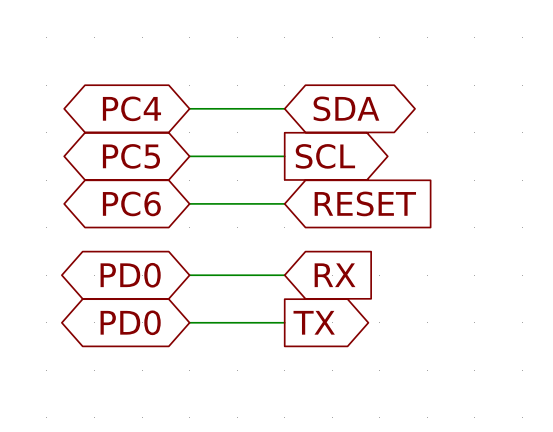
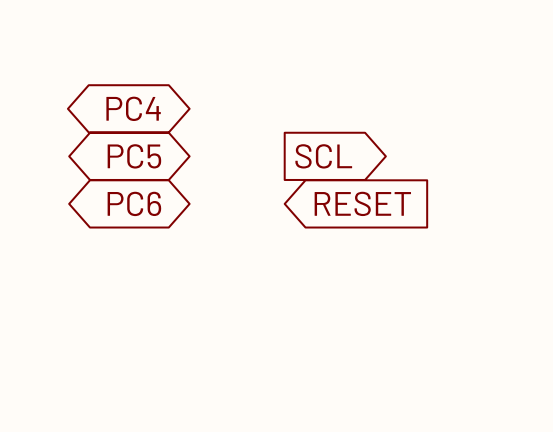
wire: (189, 108) (284, 108) -> none
global label: SDA (346, 108) -> none
wire: (189, 156) (284, 156) -> none
wire: (189, 203) (284, 203) -> none
global label: PD0 (130, 275) -> none
wire: (189, 275) (284, 275) -> none
global label: RX (335, 275) -> none
global label: PD0 (130, 322) -> none
wire: (189, 322) (284, 322) -> none
global label: TX (314, 322) -> none

